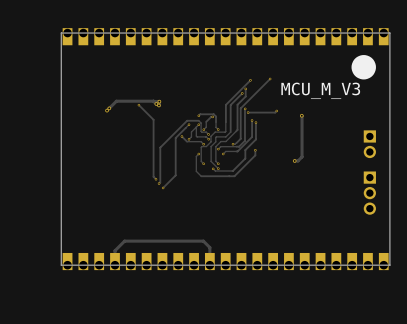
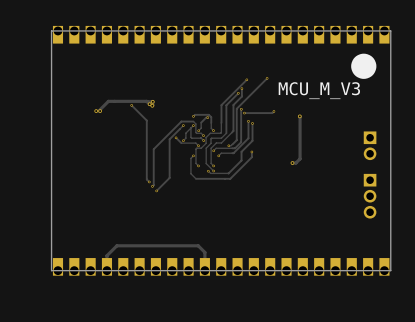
via: (109, 108) -> none
via: none -> (96, 111)
via: (107, 110) -> none
via: none -> (100, 111)

